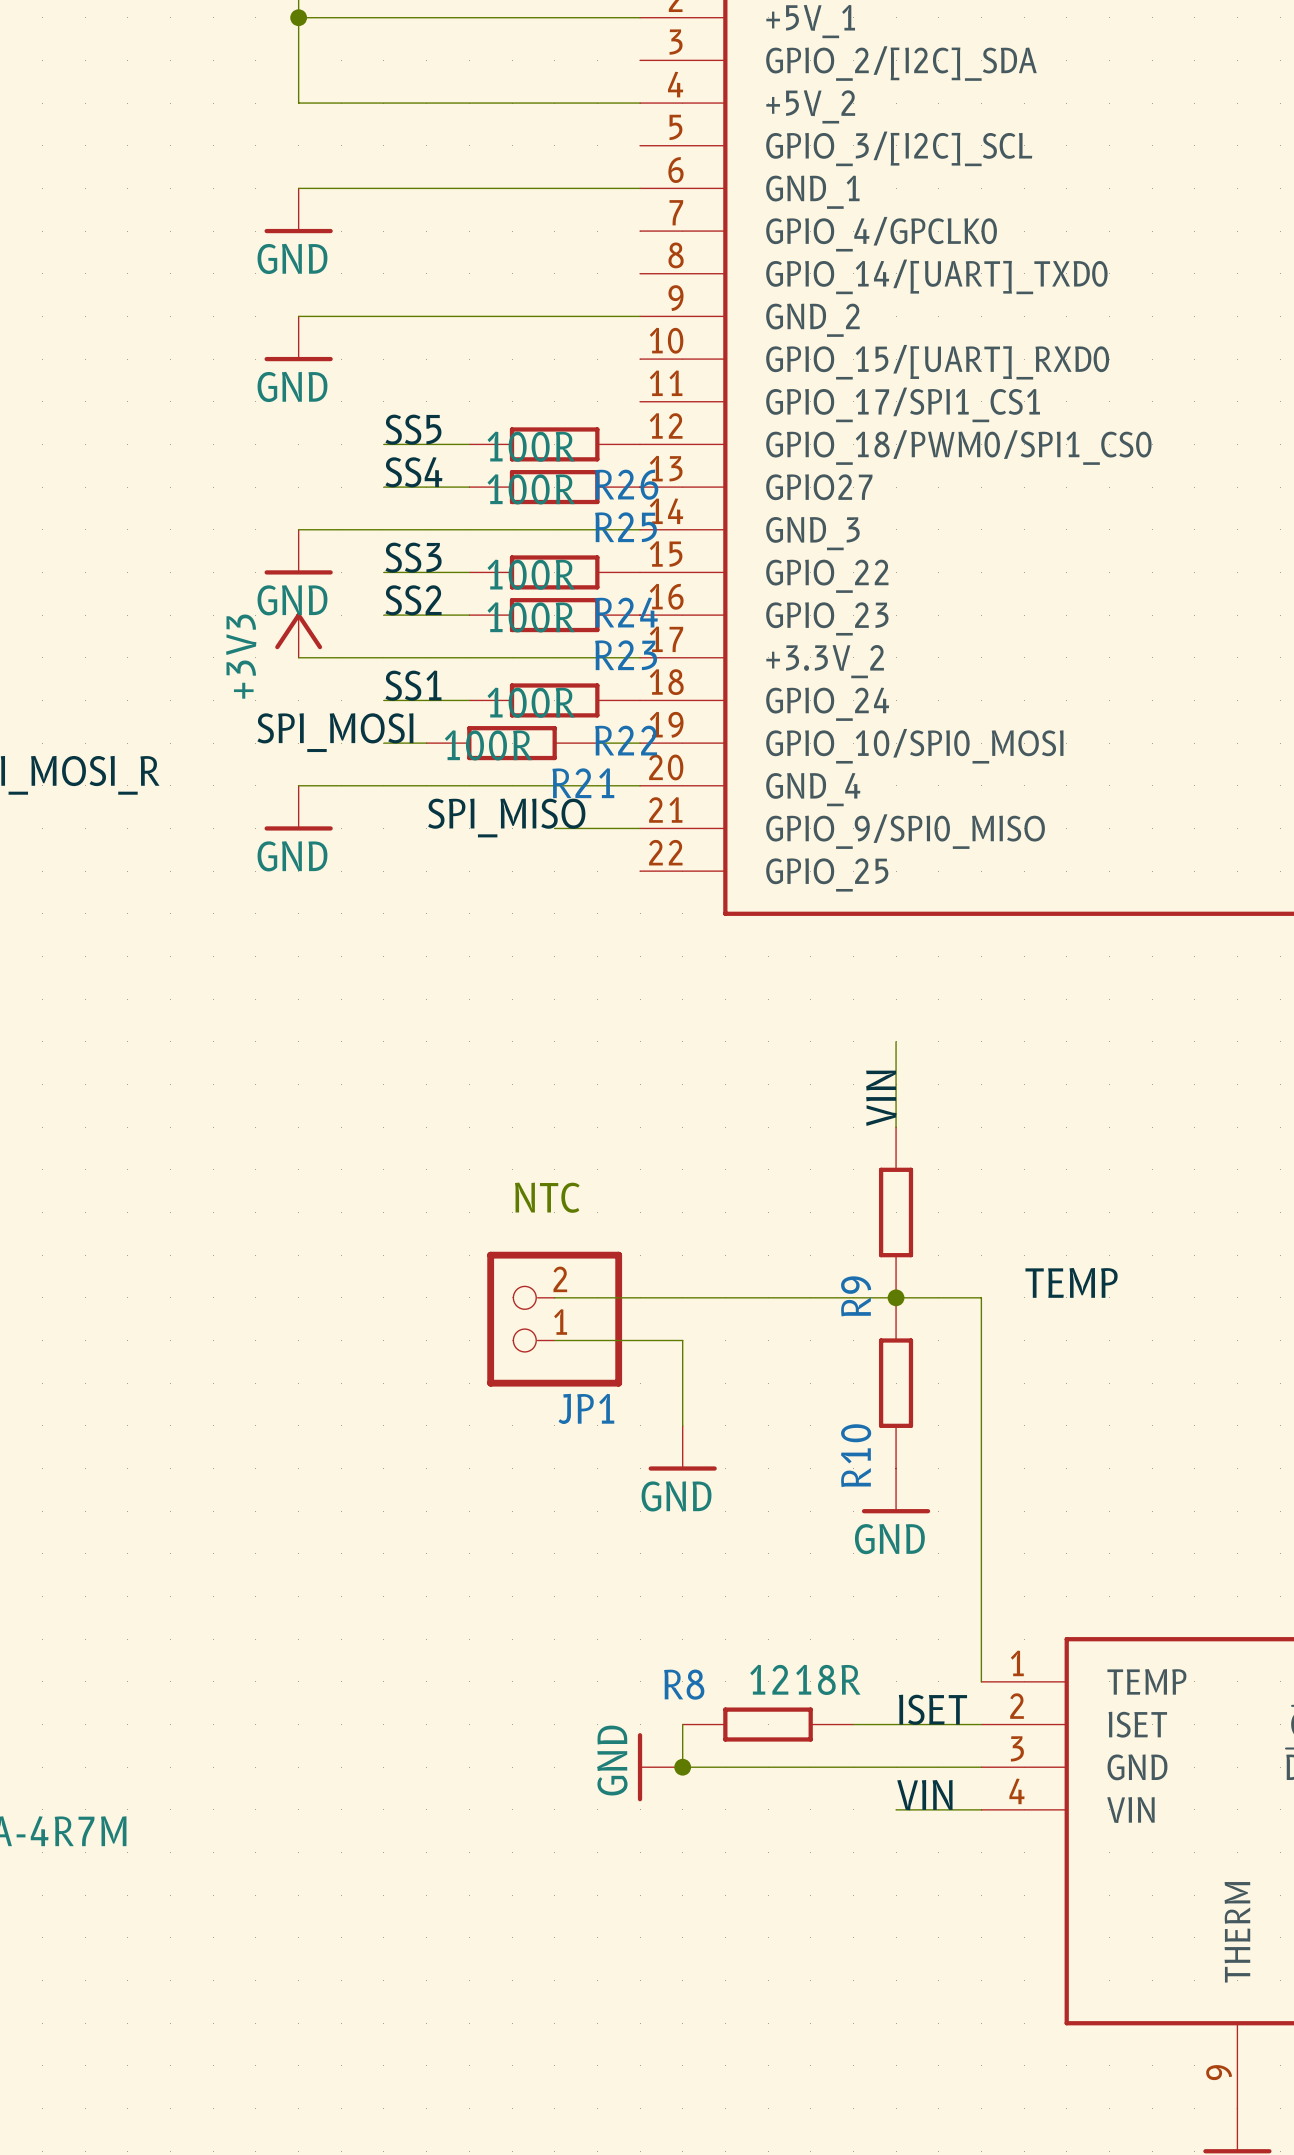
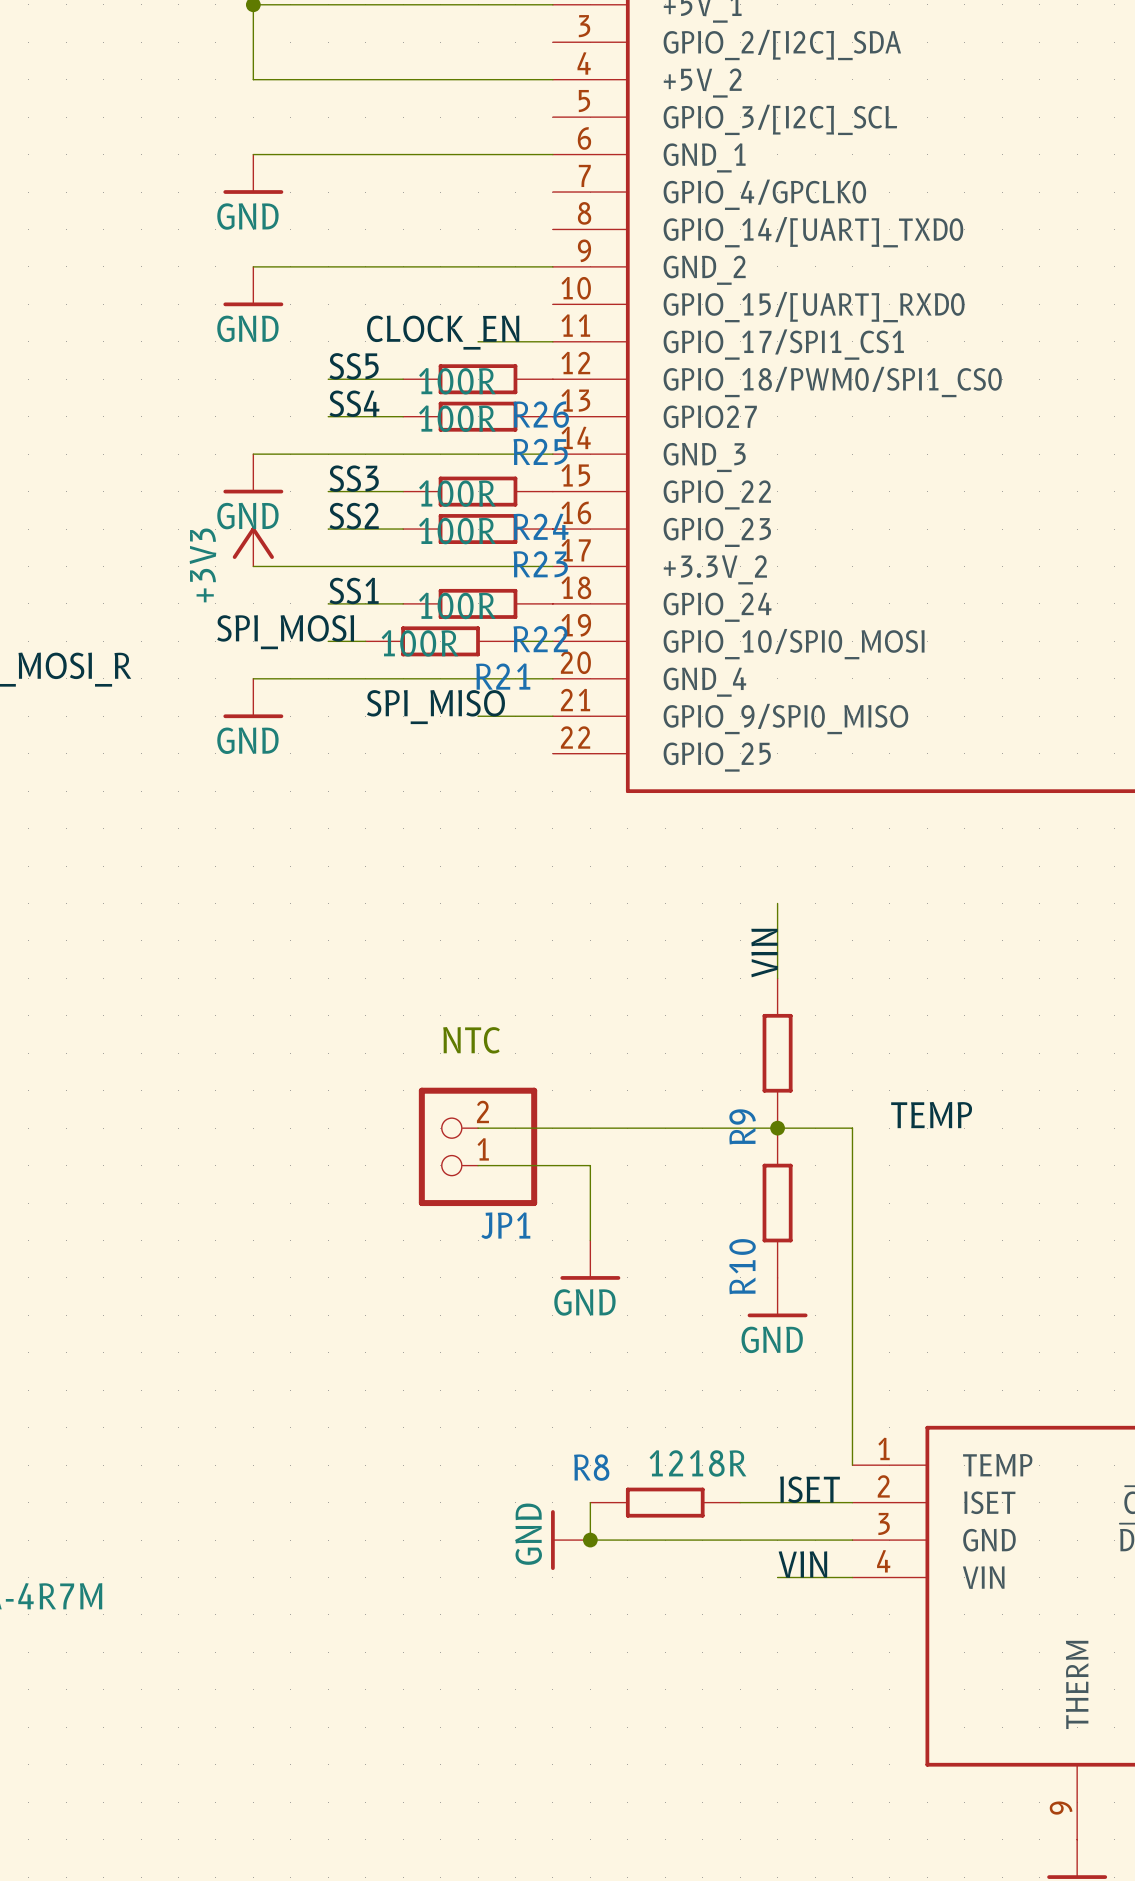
label: none -> CLOCK_EN (443, 332)
wire: none -> (478, 341) (552, 341)

